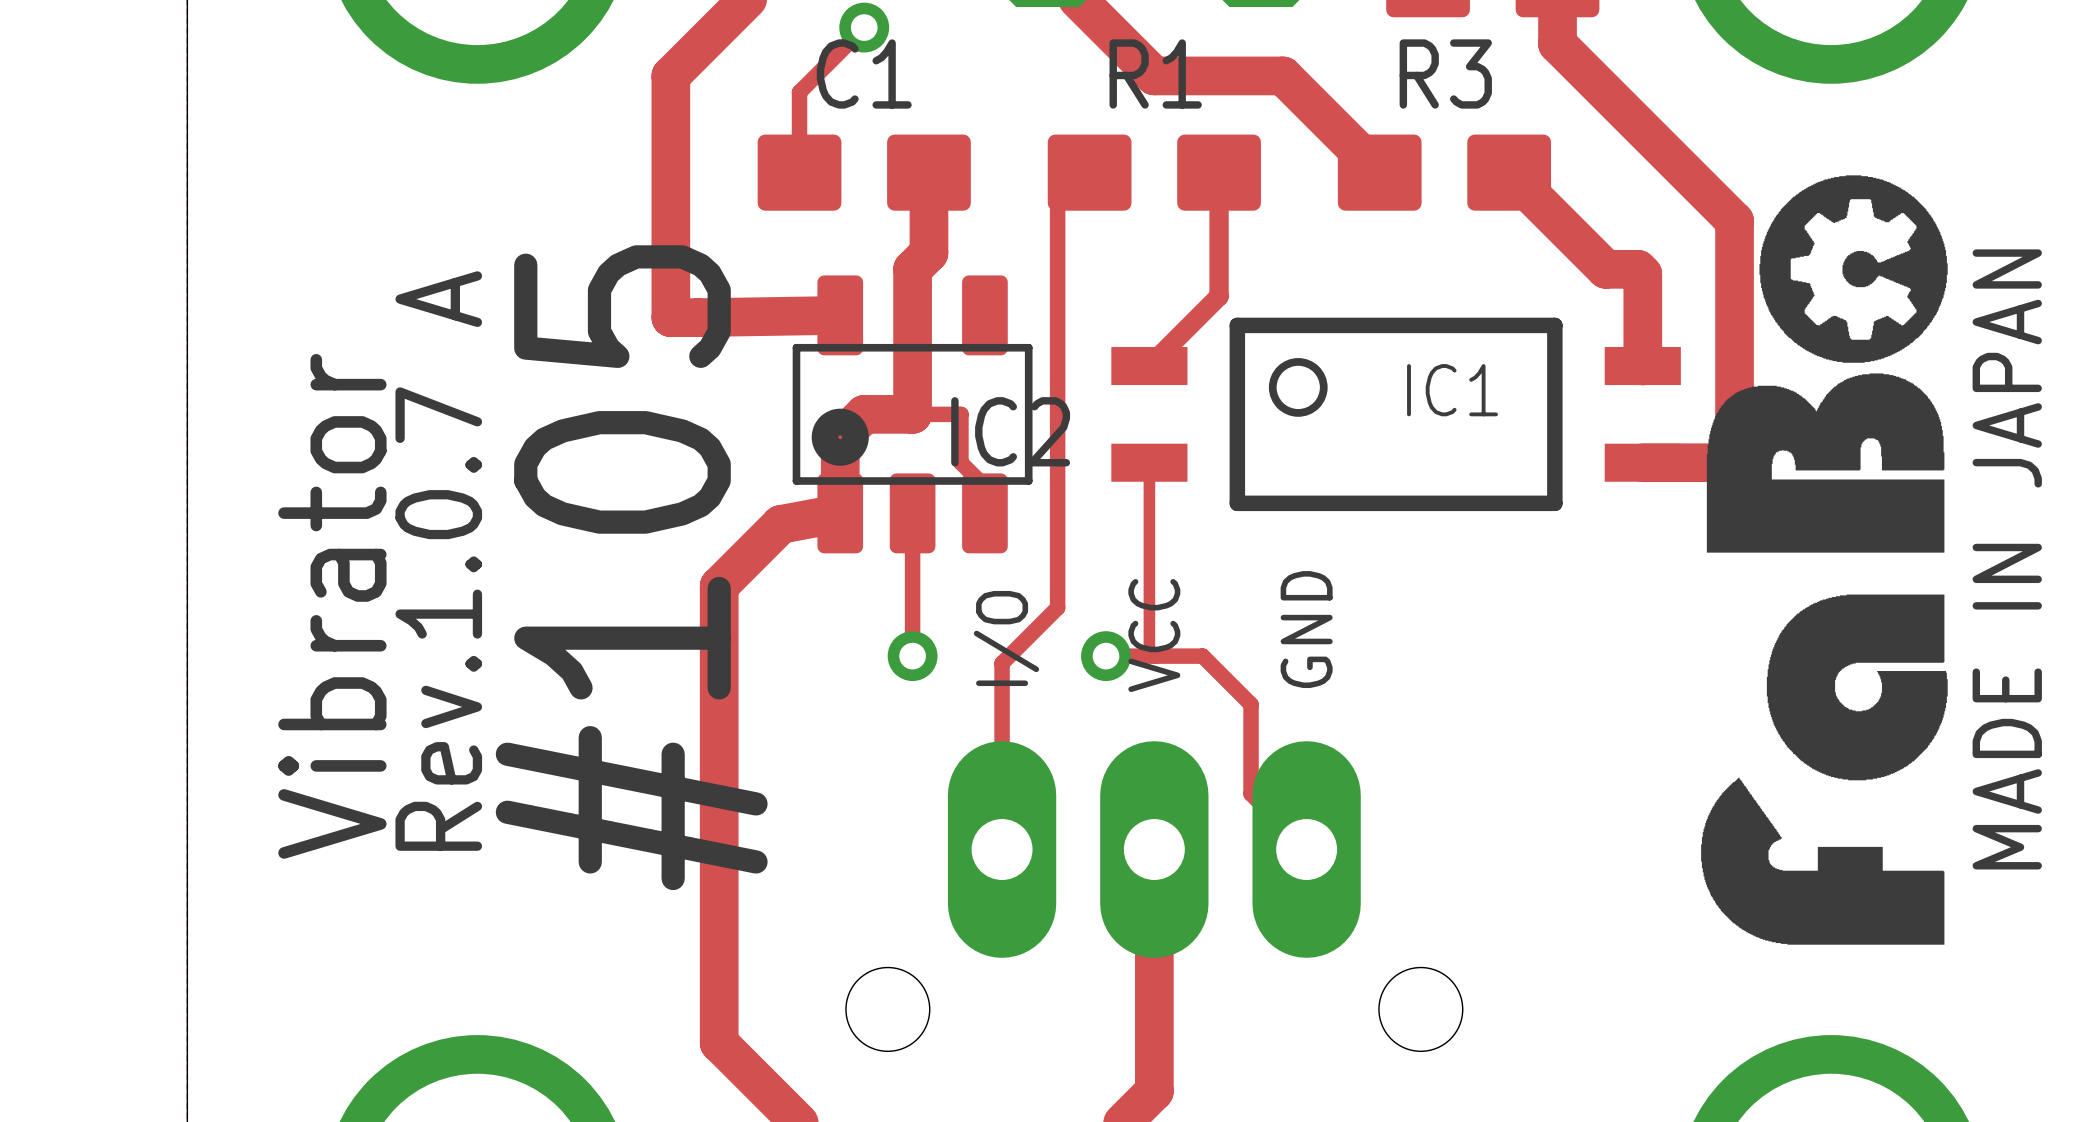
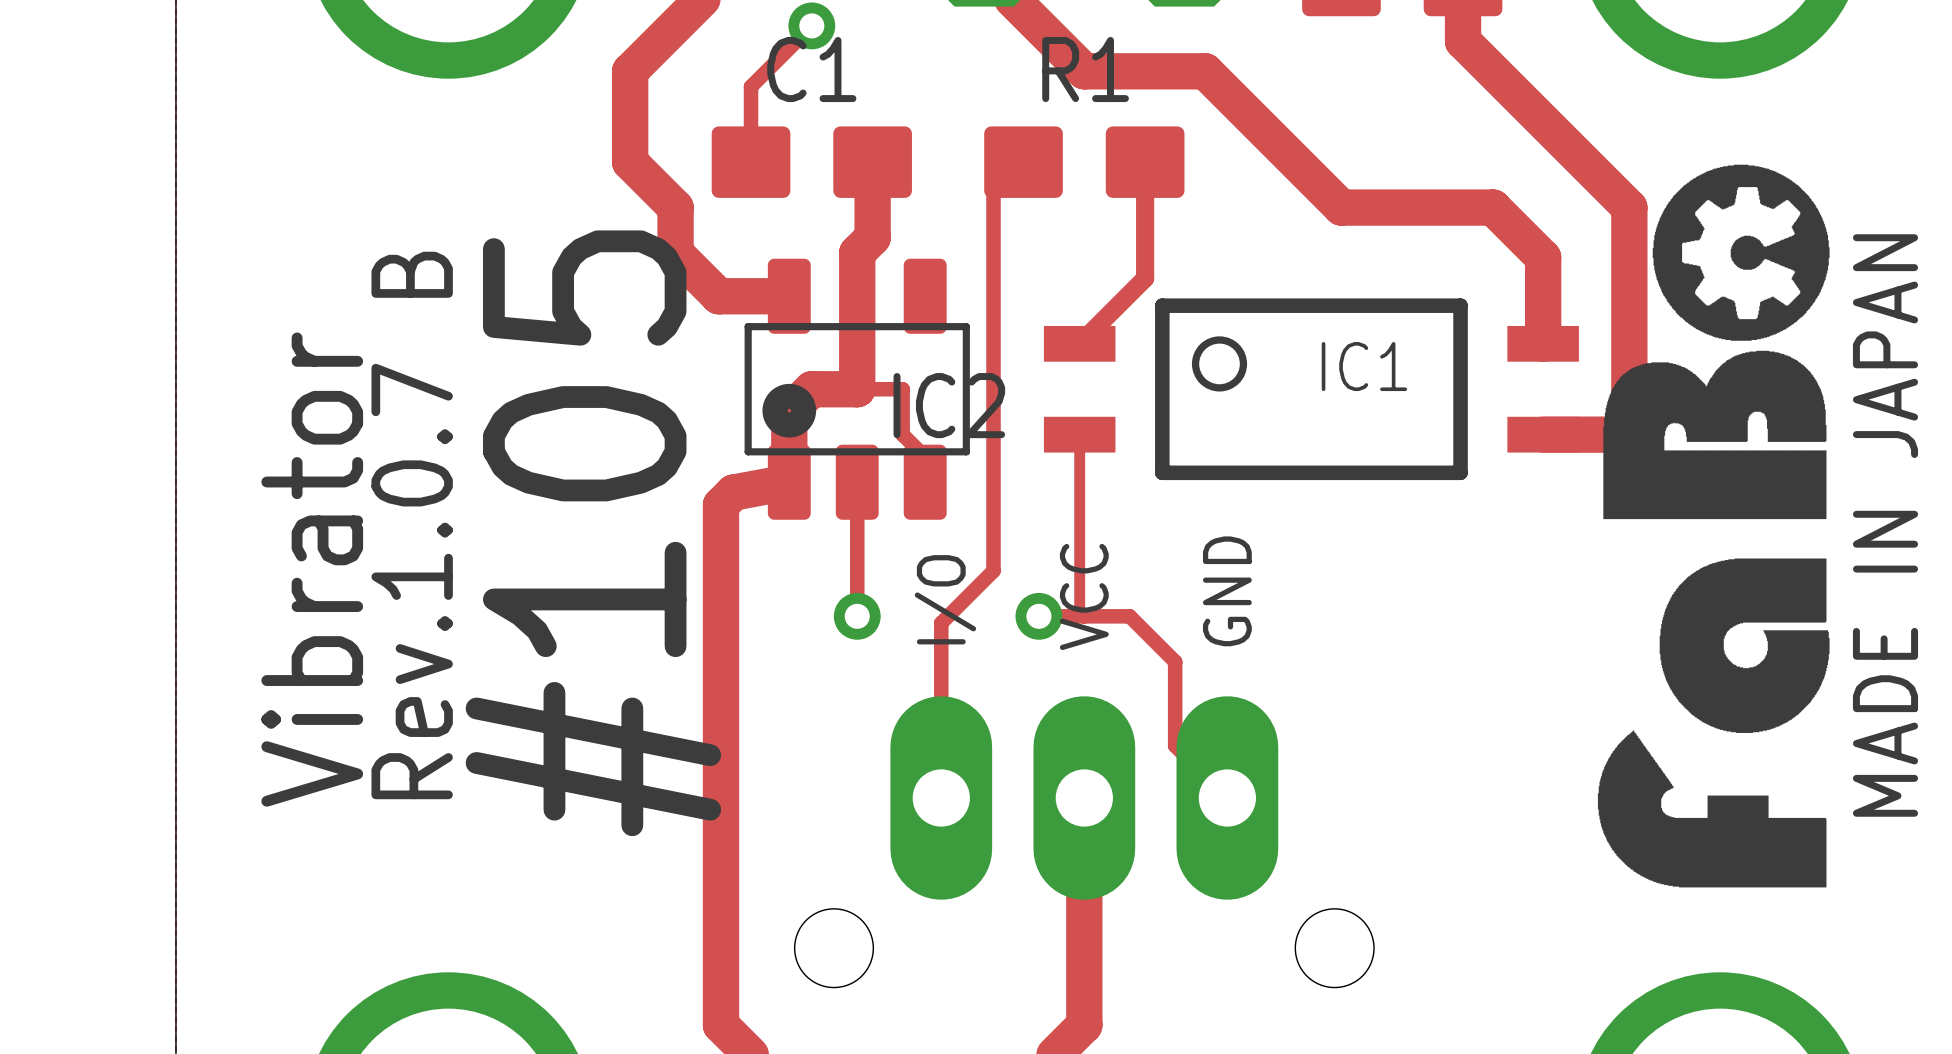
track: (670, 172) (670, 317) (840, 315) -> (630, 162) (675, 207) (675, 252) (718, 296) (789, 296)
R3: (1444, 172) -> none
track: (1509, 172) (1605, 269) (1637, 269) -> (1296, 162) (1341, 207) (1493, 207) (1538, 252)
track: (767, 537) (719, 586) (719, 1042) (767, 1091) -> (720, 505) (720, 1025)
text: Rev.1.0.7 A (438, 561) -> Rev.1.0.7 B (412, 525)

